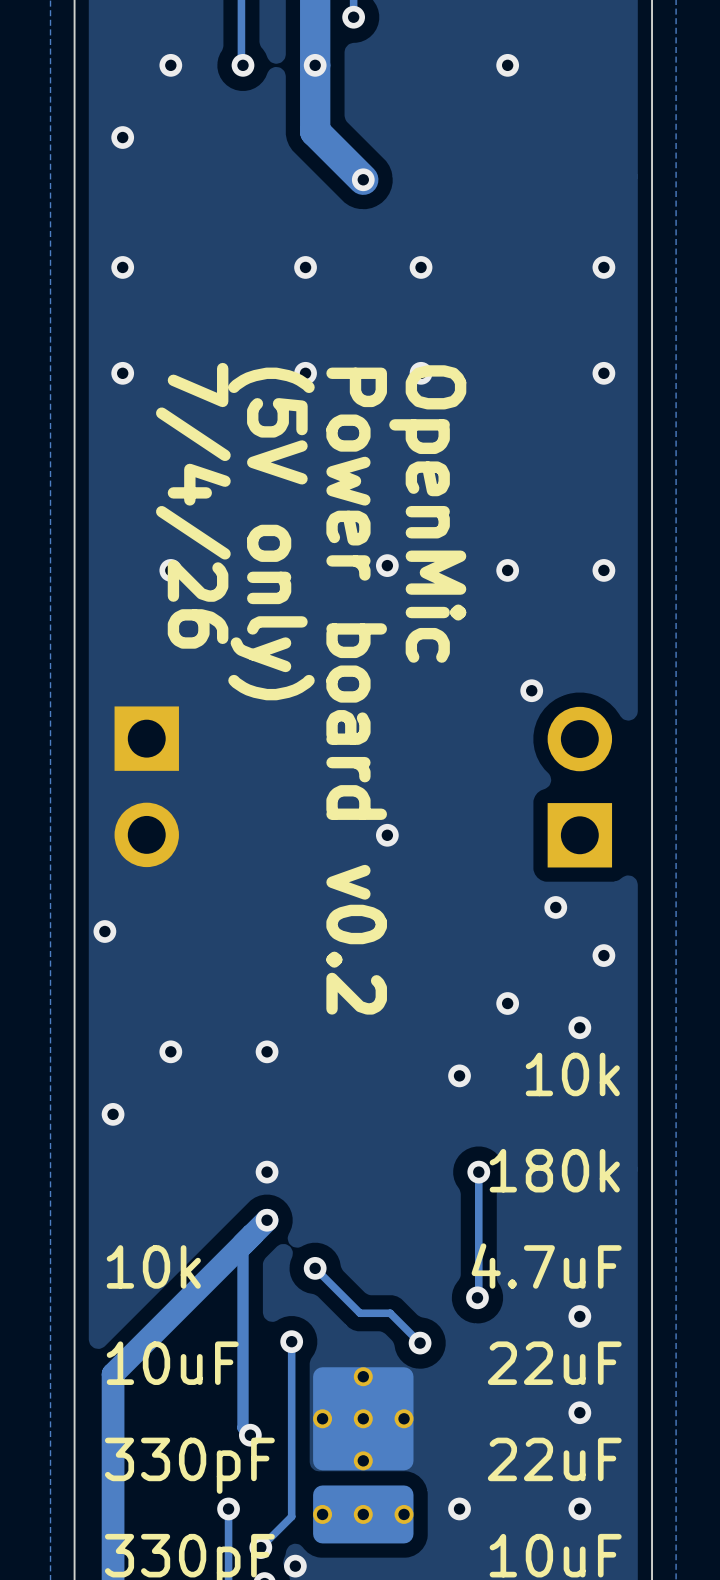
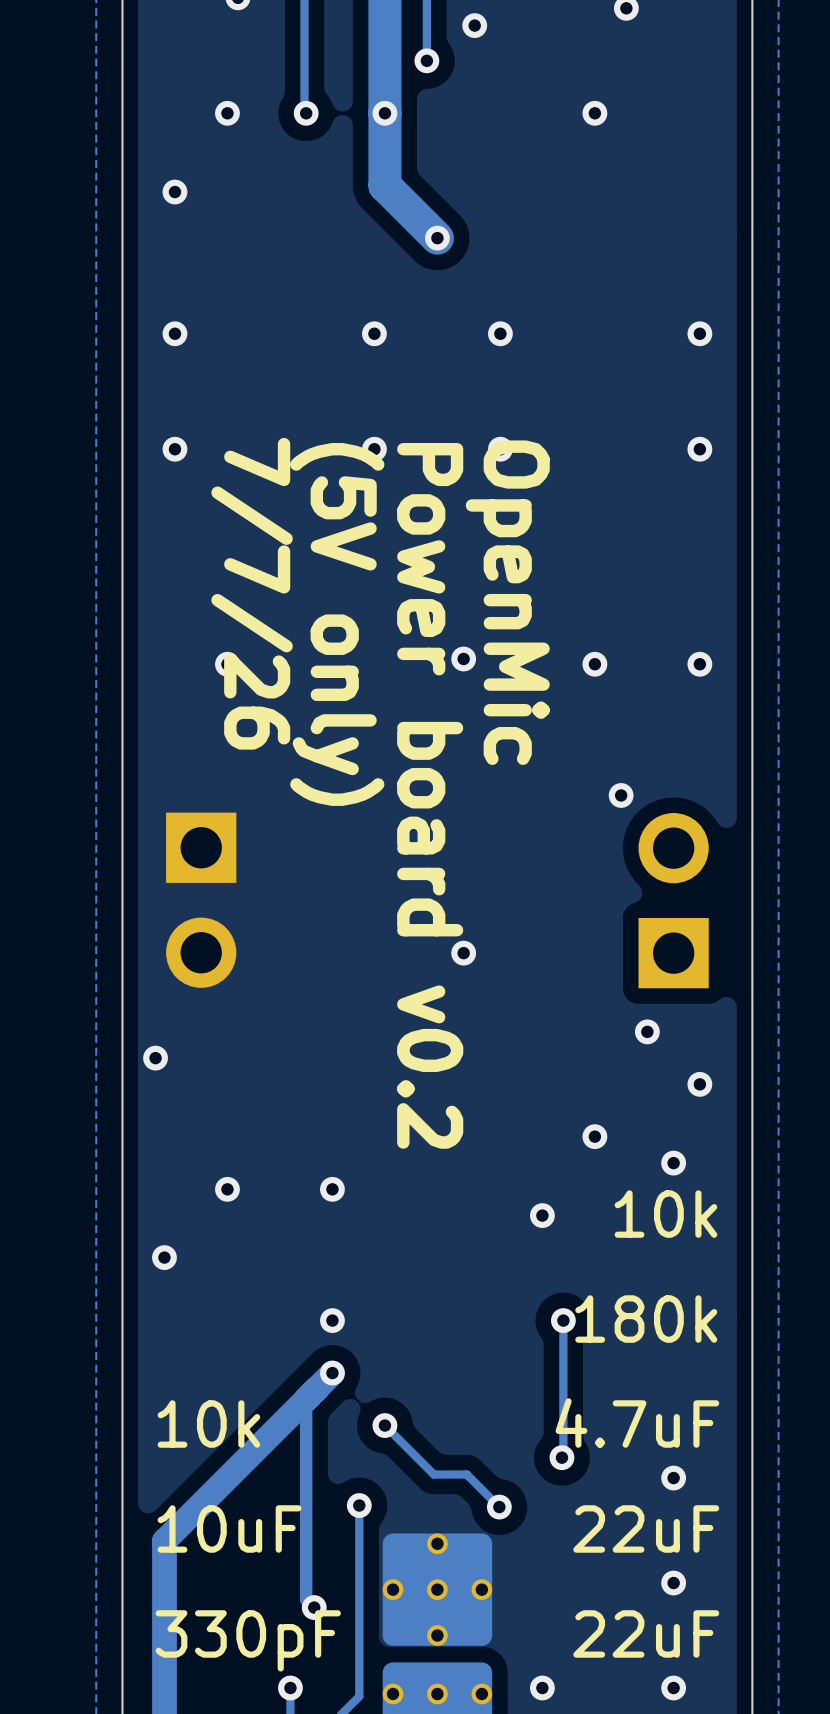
text: 7/4/26 (193, 505) -> 7/7/26 (252, 593)

